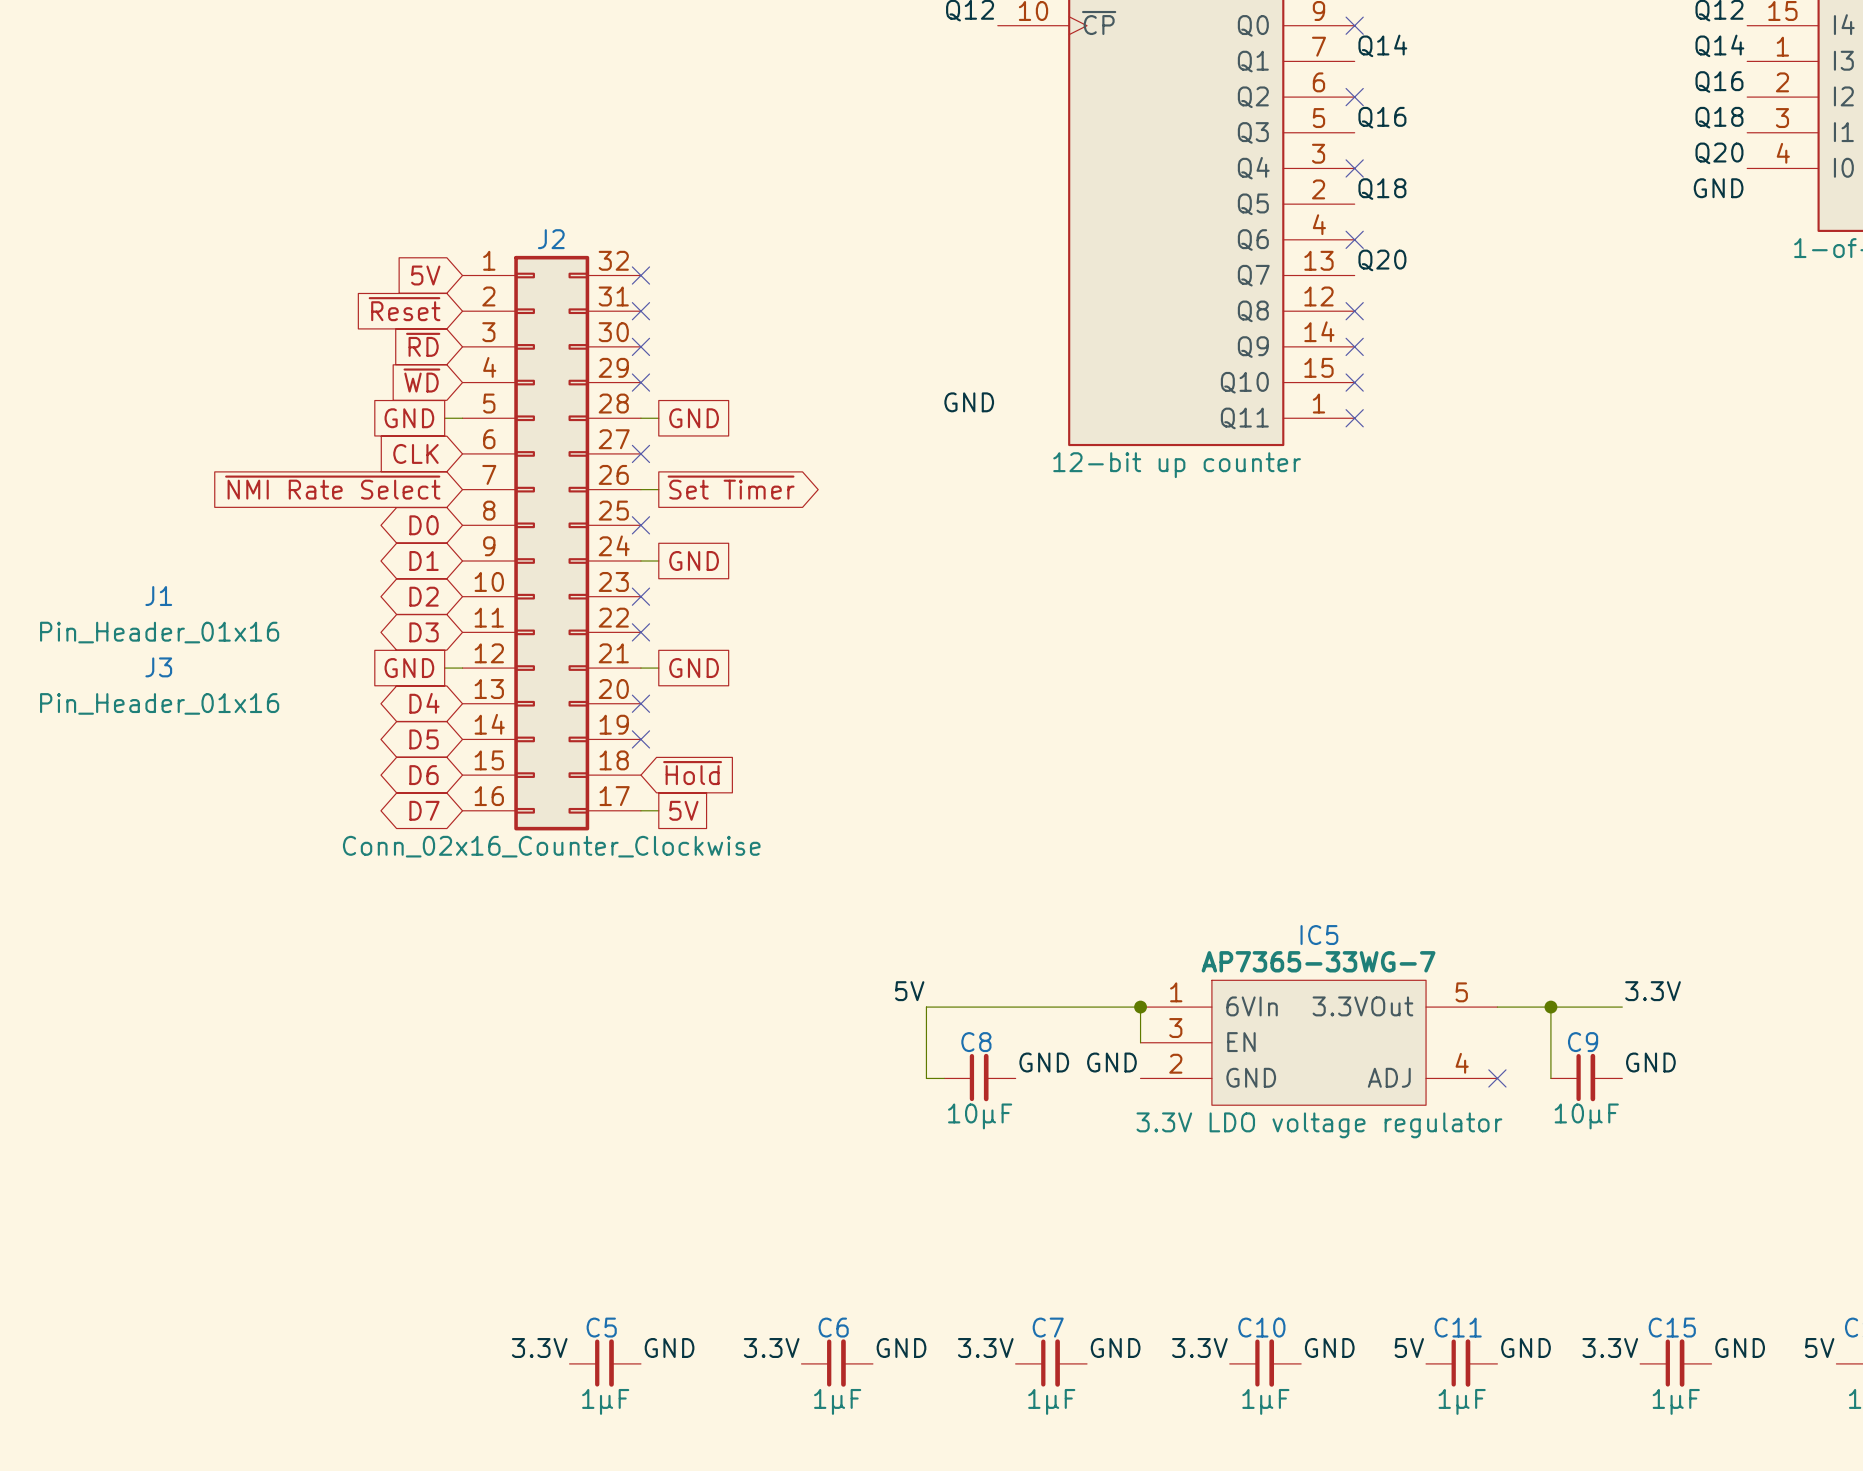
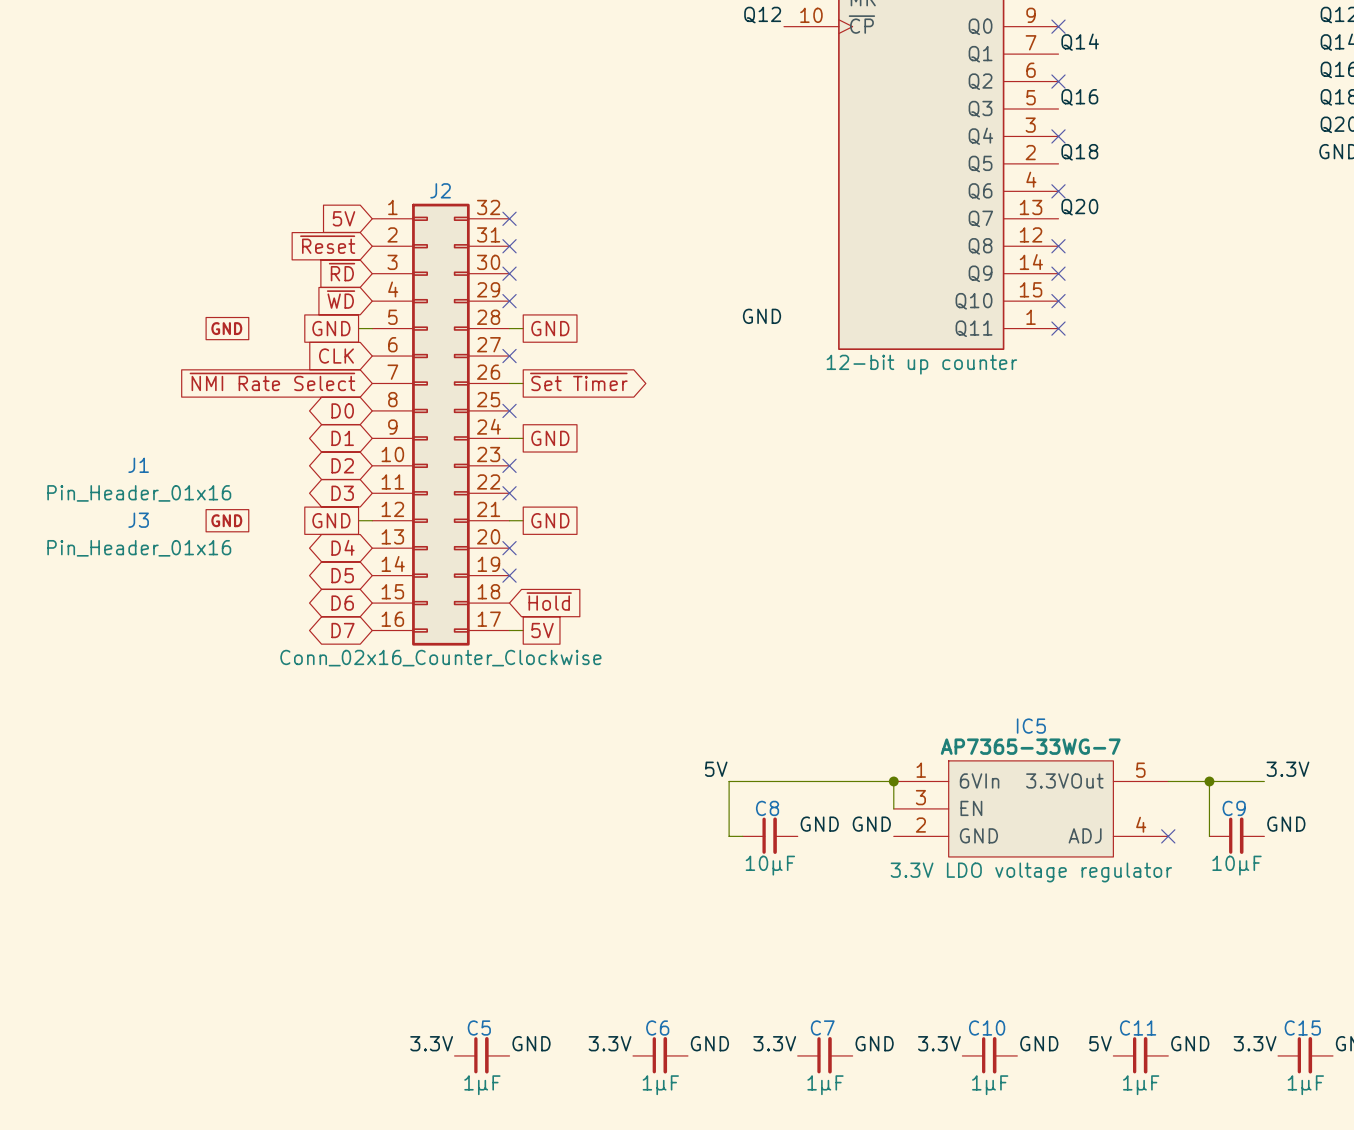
global label: none -> GND (226, 328)
global label: none -> GND (226, 520)

